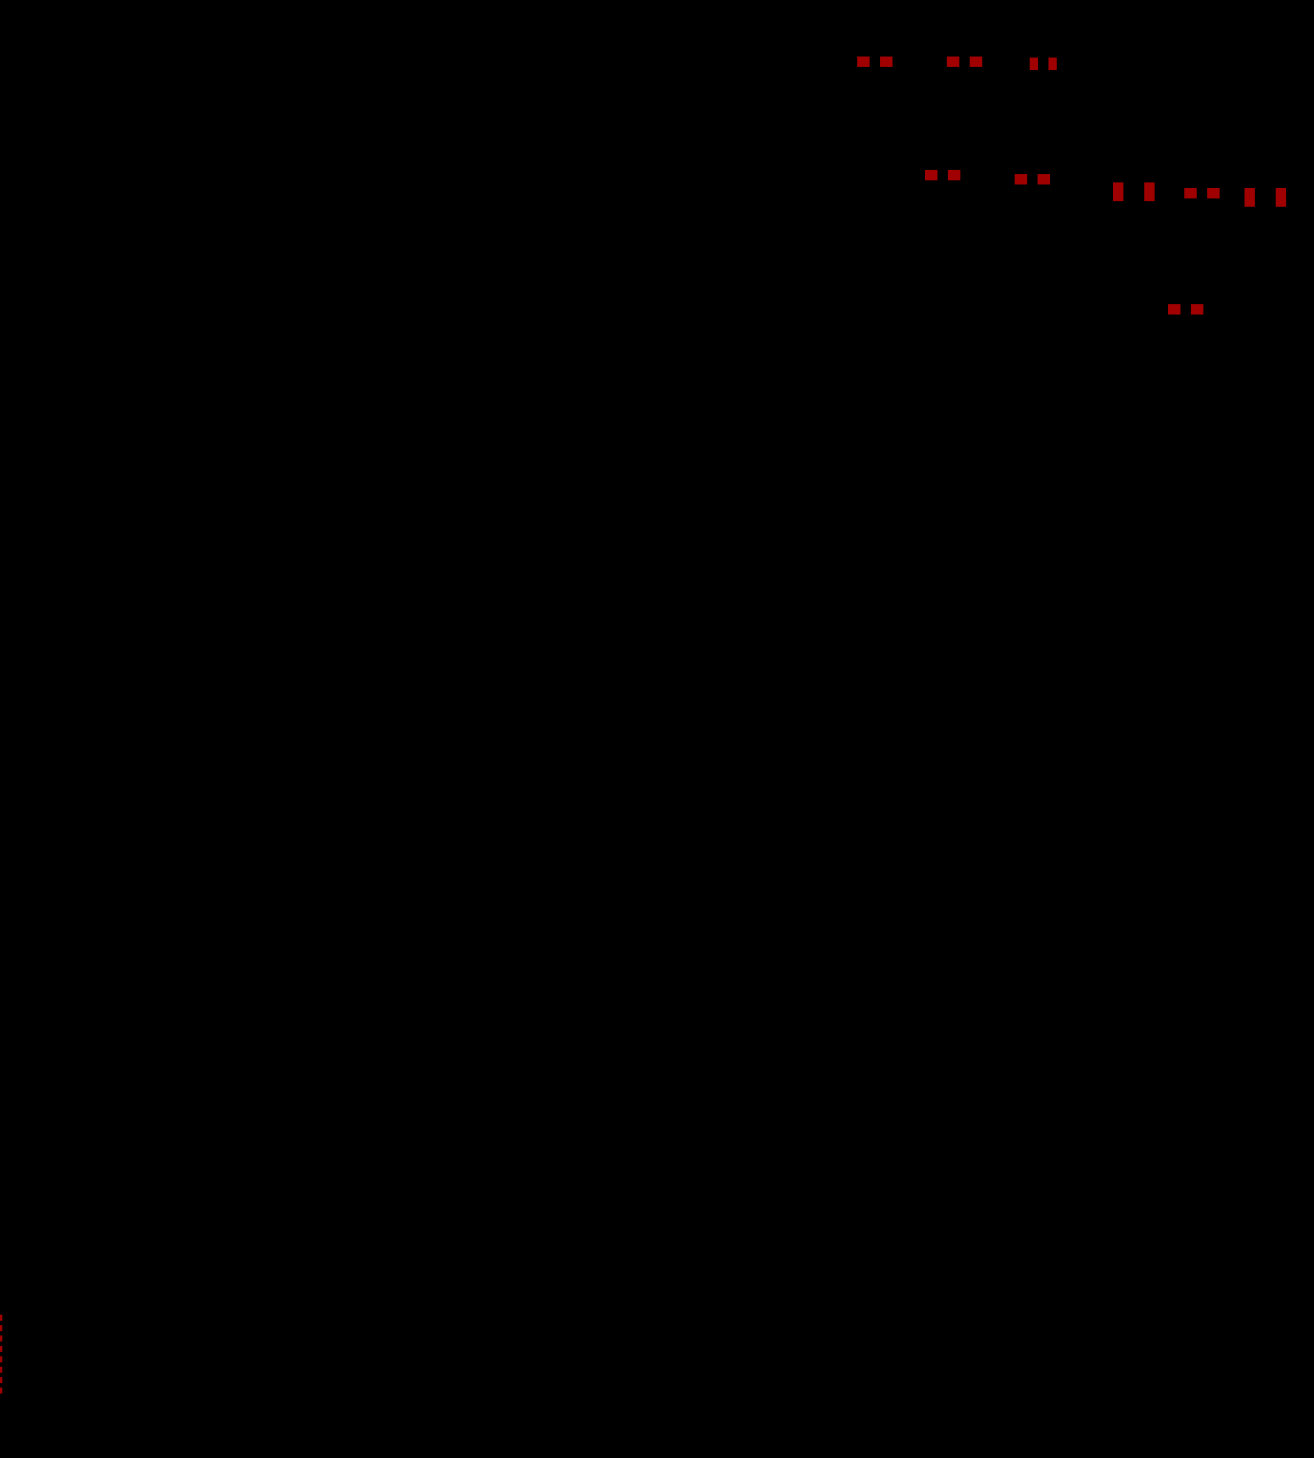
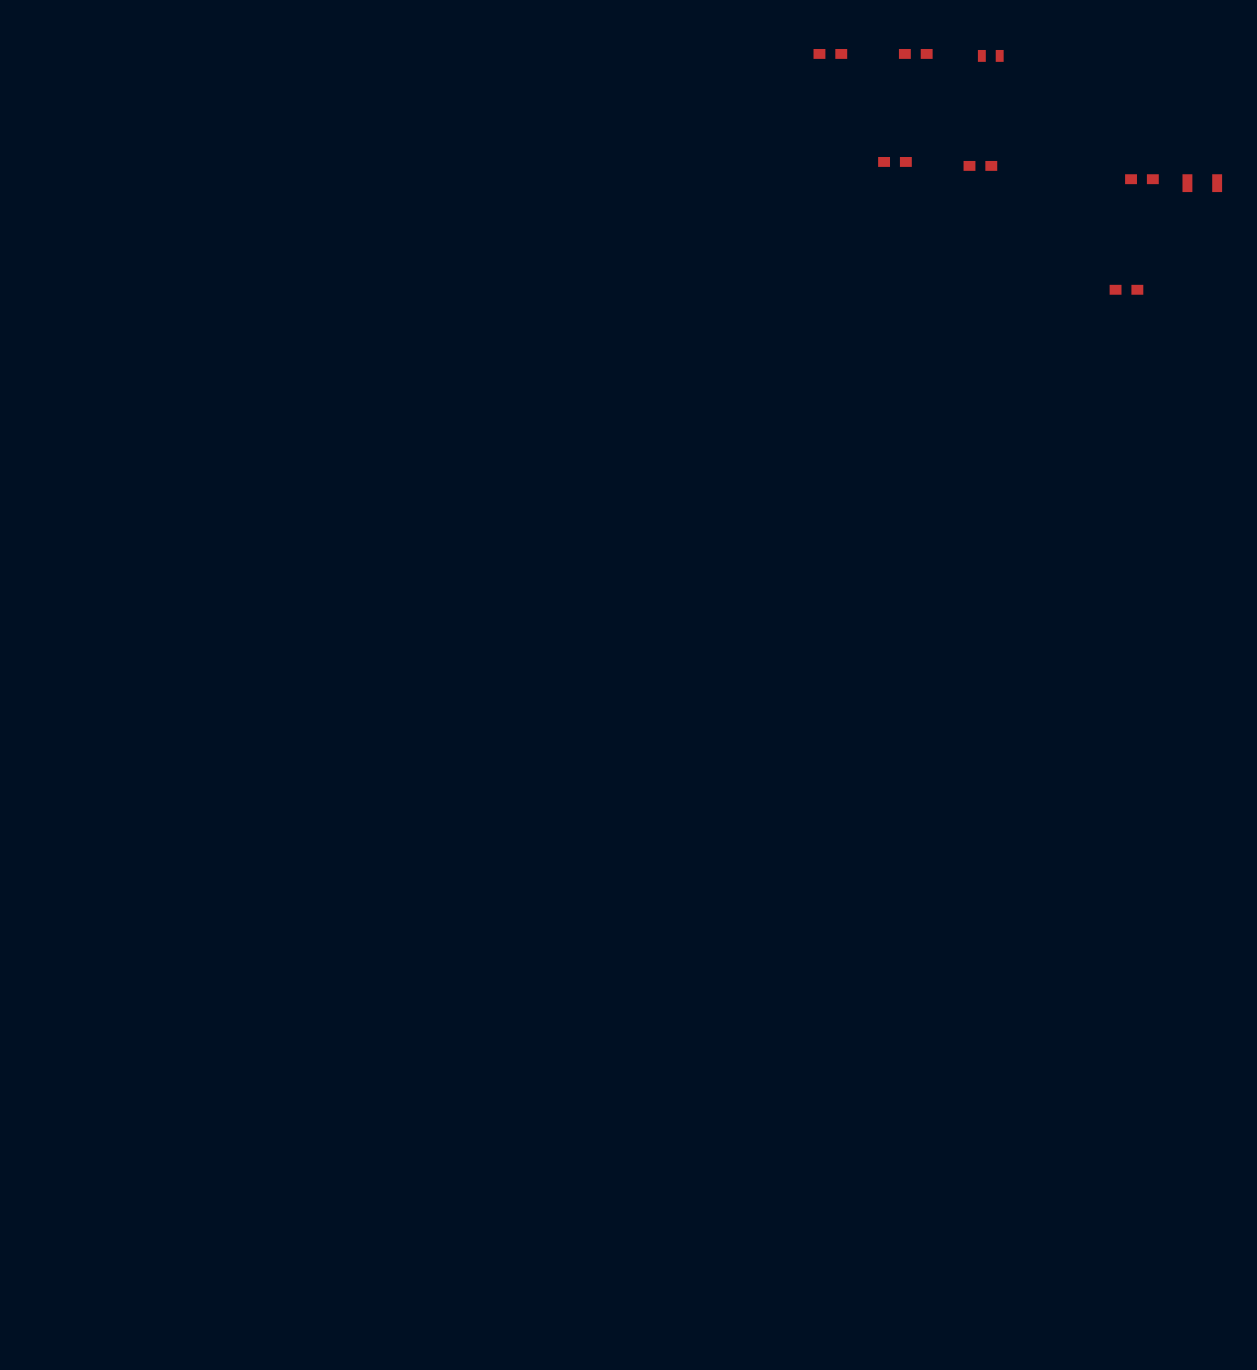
part: (1133, 191) -> none

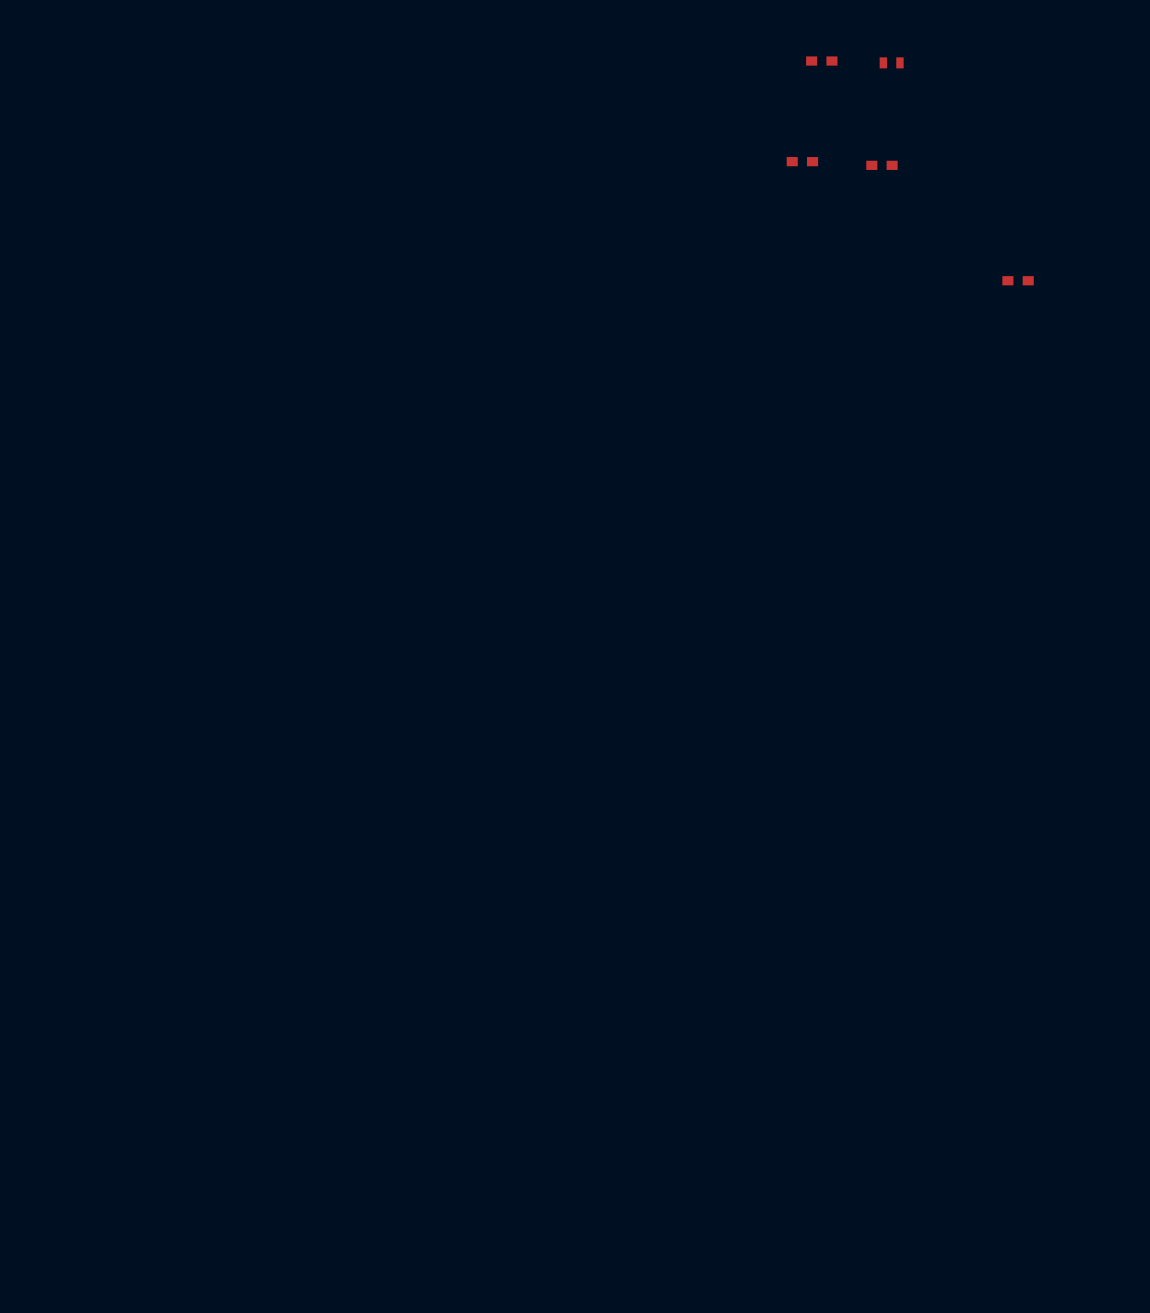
part: (830, 53) -> none
part: (1141, 179) -> none
part: (1202, 183) -> none

